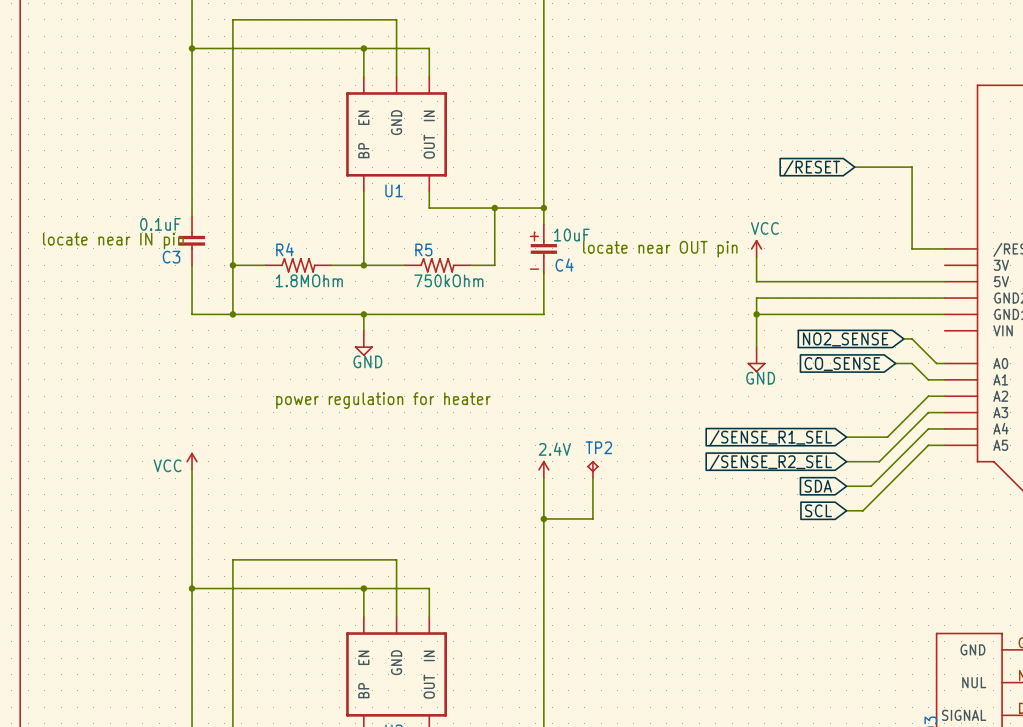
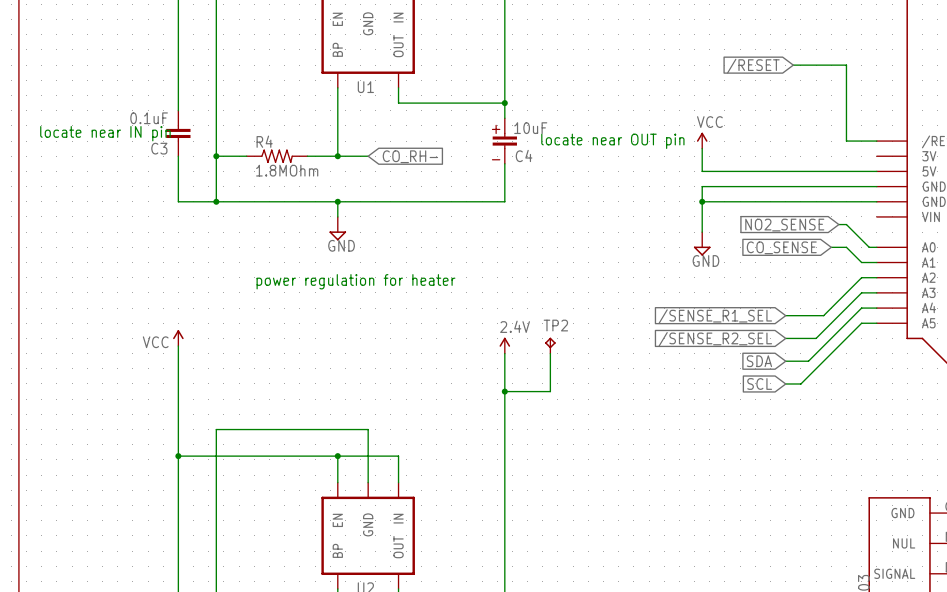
wire: (494, 208) (494, 265) (470, 265) -> none
junction: (494, 208) -> none
wire: (396, 265) (404, 265) -> none
R5: 750kOhm (437, 265) -> none
global label: none -> CO_RH- (410, 156)

